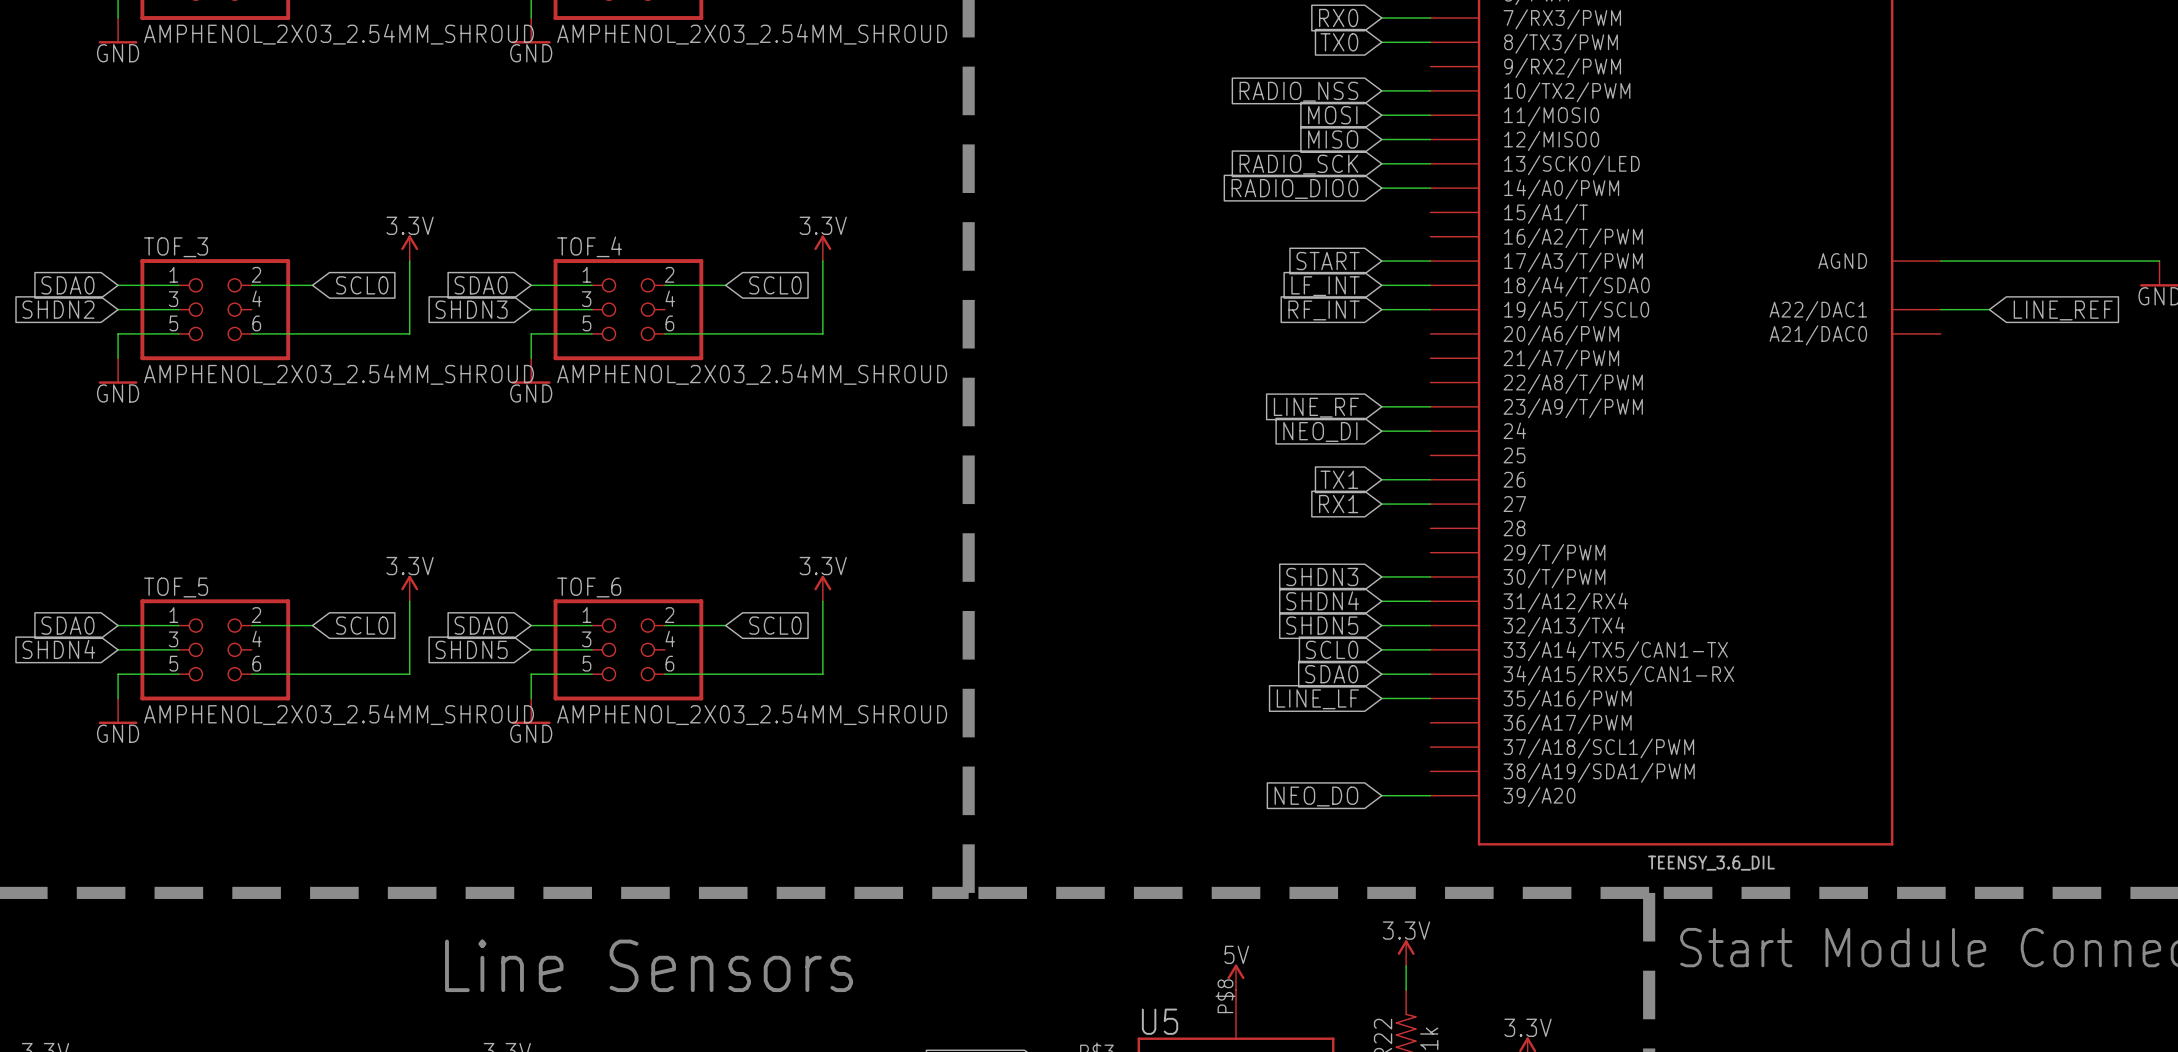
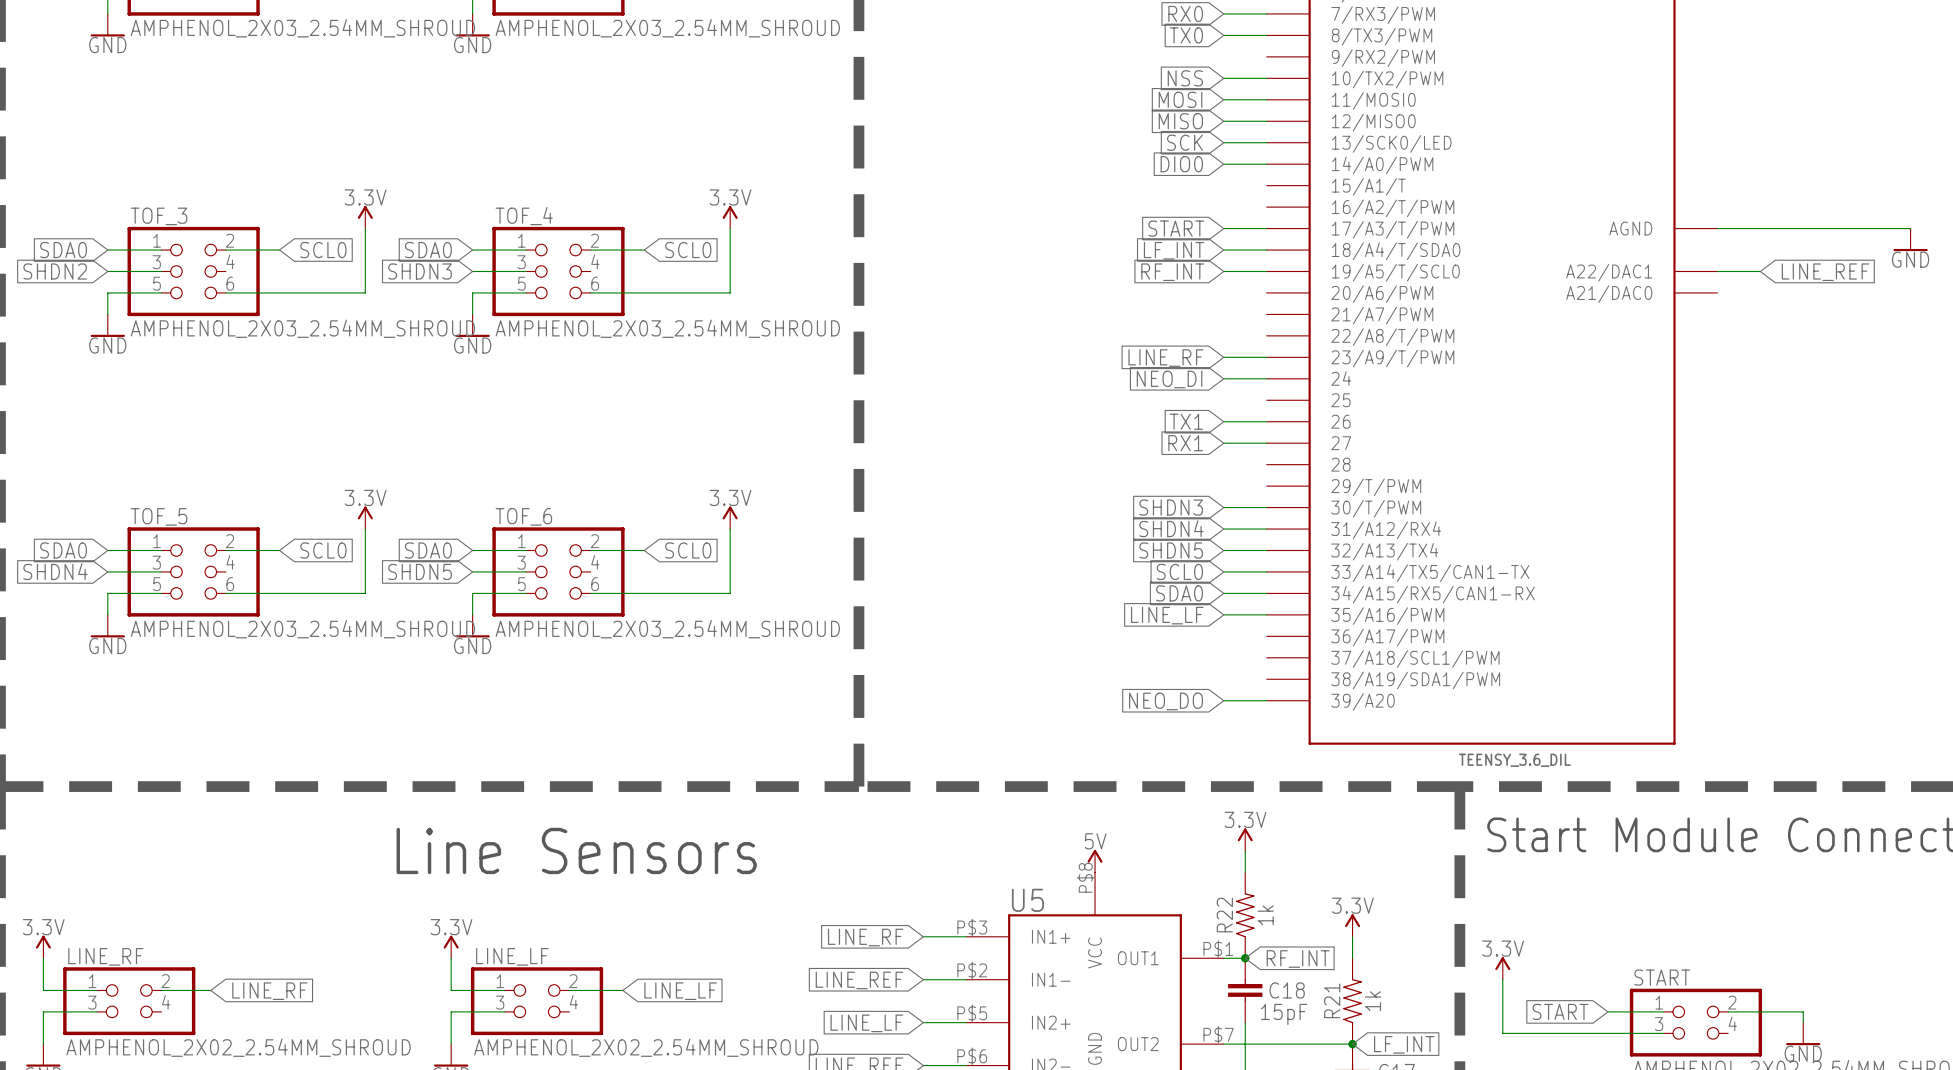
global label: RADIO_NSS (1298, 91) -> NSS (1185, 78)
global label: RADIO_SCK (1298, 164) -> SCK (1185, 142)
global label: RADIO_DIO0 (1294, 188) -> DIO0 (1181, 164)

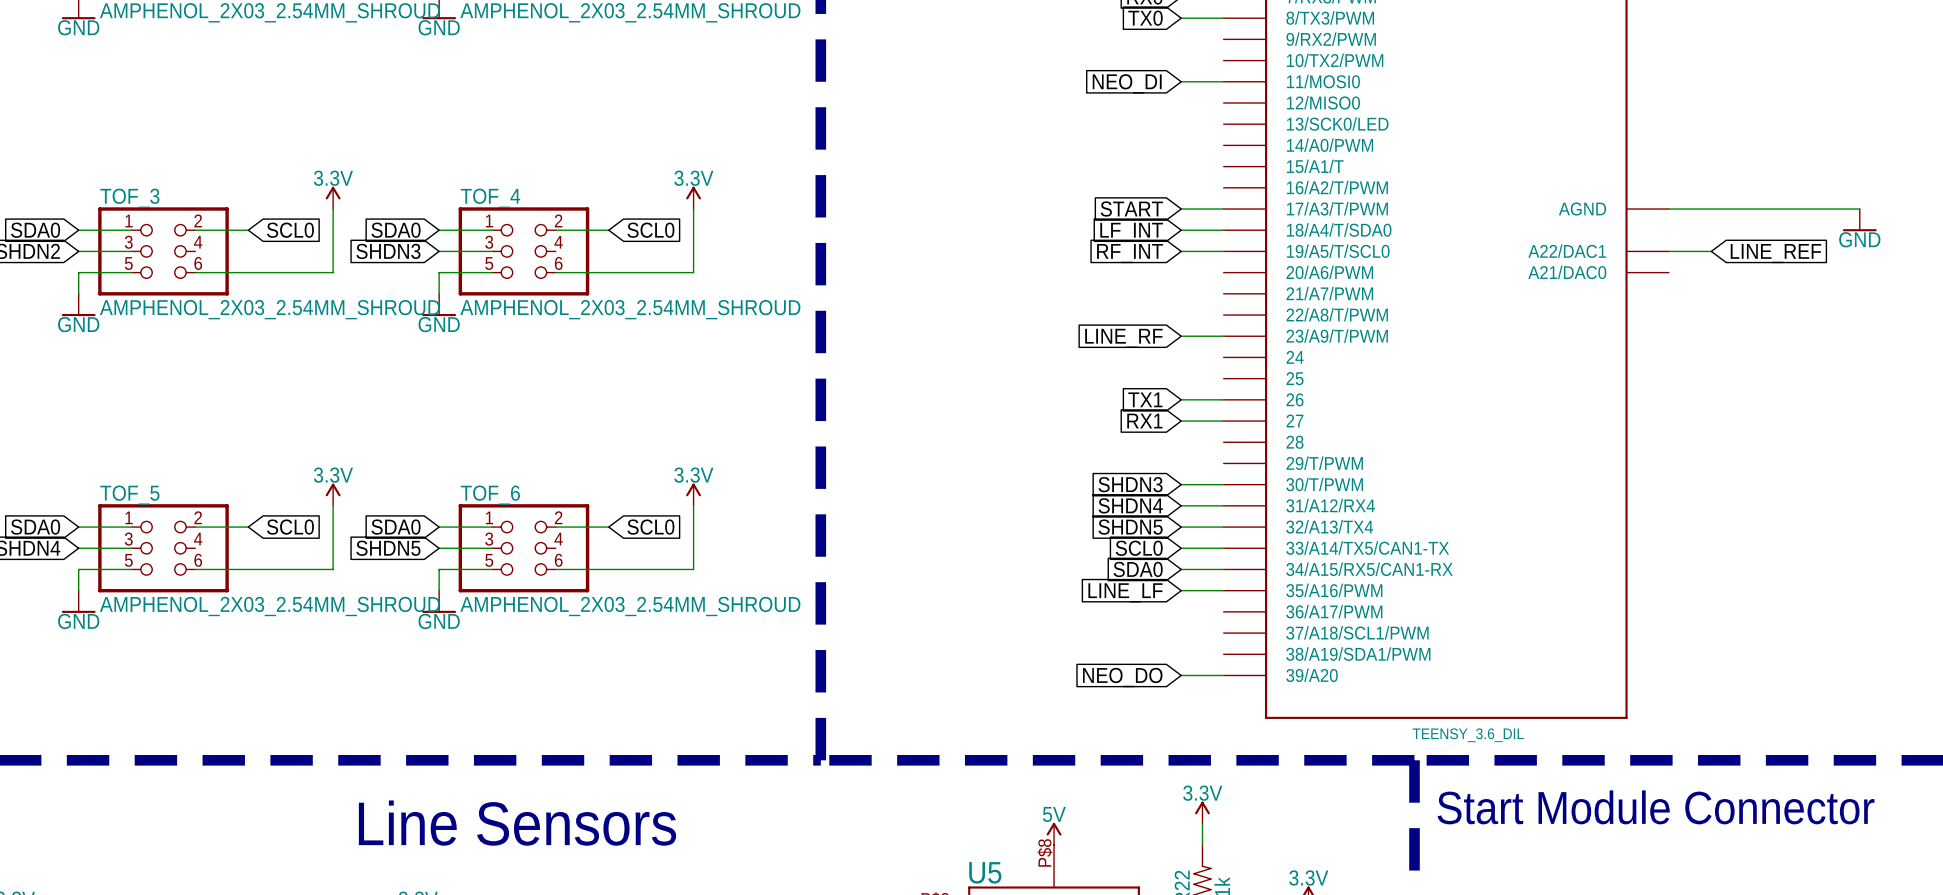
global label: NSS (1185, 78) -> none
wire: (1223, 78) (1266, 78) -> none
global label: MOSI (1180, 99) -> NEO_DI (1127, 83)
global label: MISO (1180, 121) -> none
wire: (1223, 121) (1266, 121) -> none
global label: SCK (1185, 142) -> none
wire: (1223, 142) (1266, 142) -> none
global label: DIO0 (1181, 164) -> none
wire: (1223, 164) (1266, 164) -> none
wire: (1223, 378) (1266, 378) -> none
global label: NEO_DI (1169, 379) -> none

